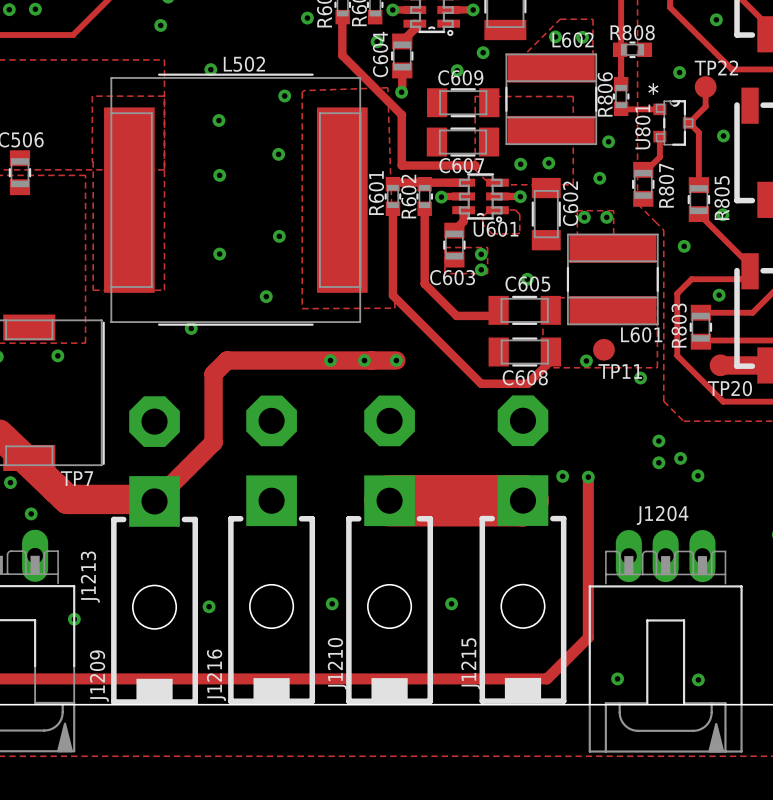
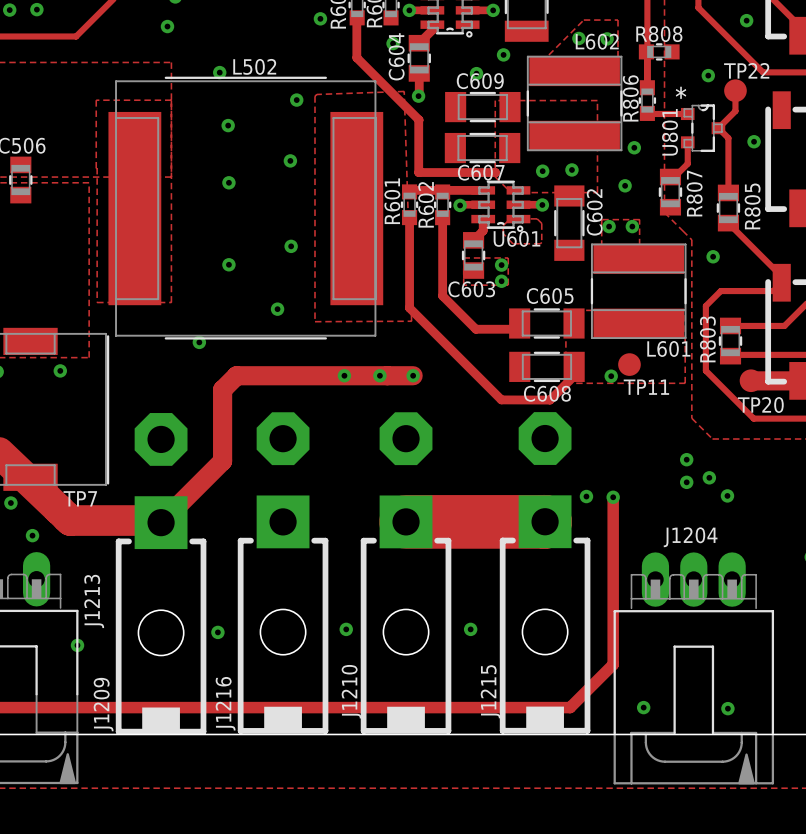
via: (722, 214) -> none
via: (527, 279) -> none
via: (719, 295) -> none
via: (640, 378) -> none

